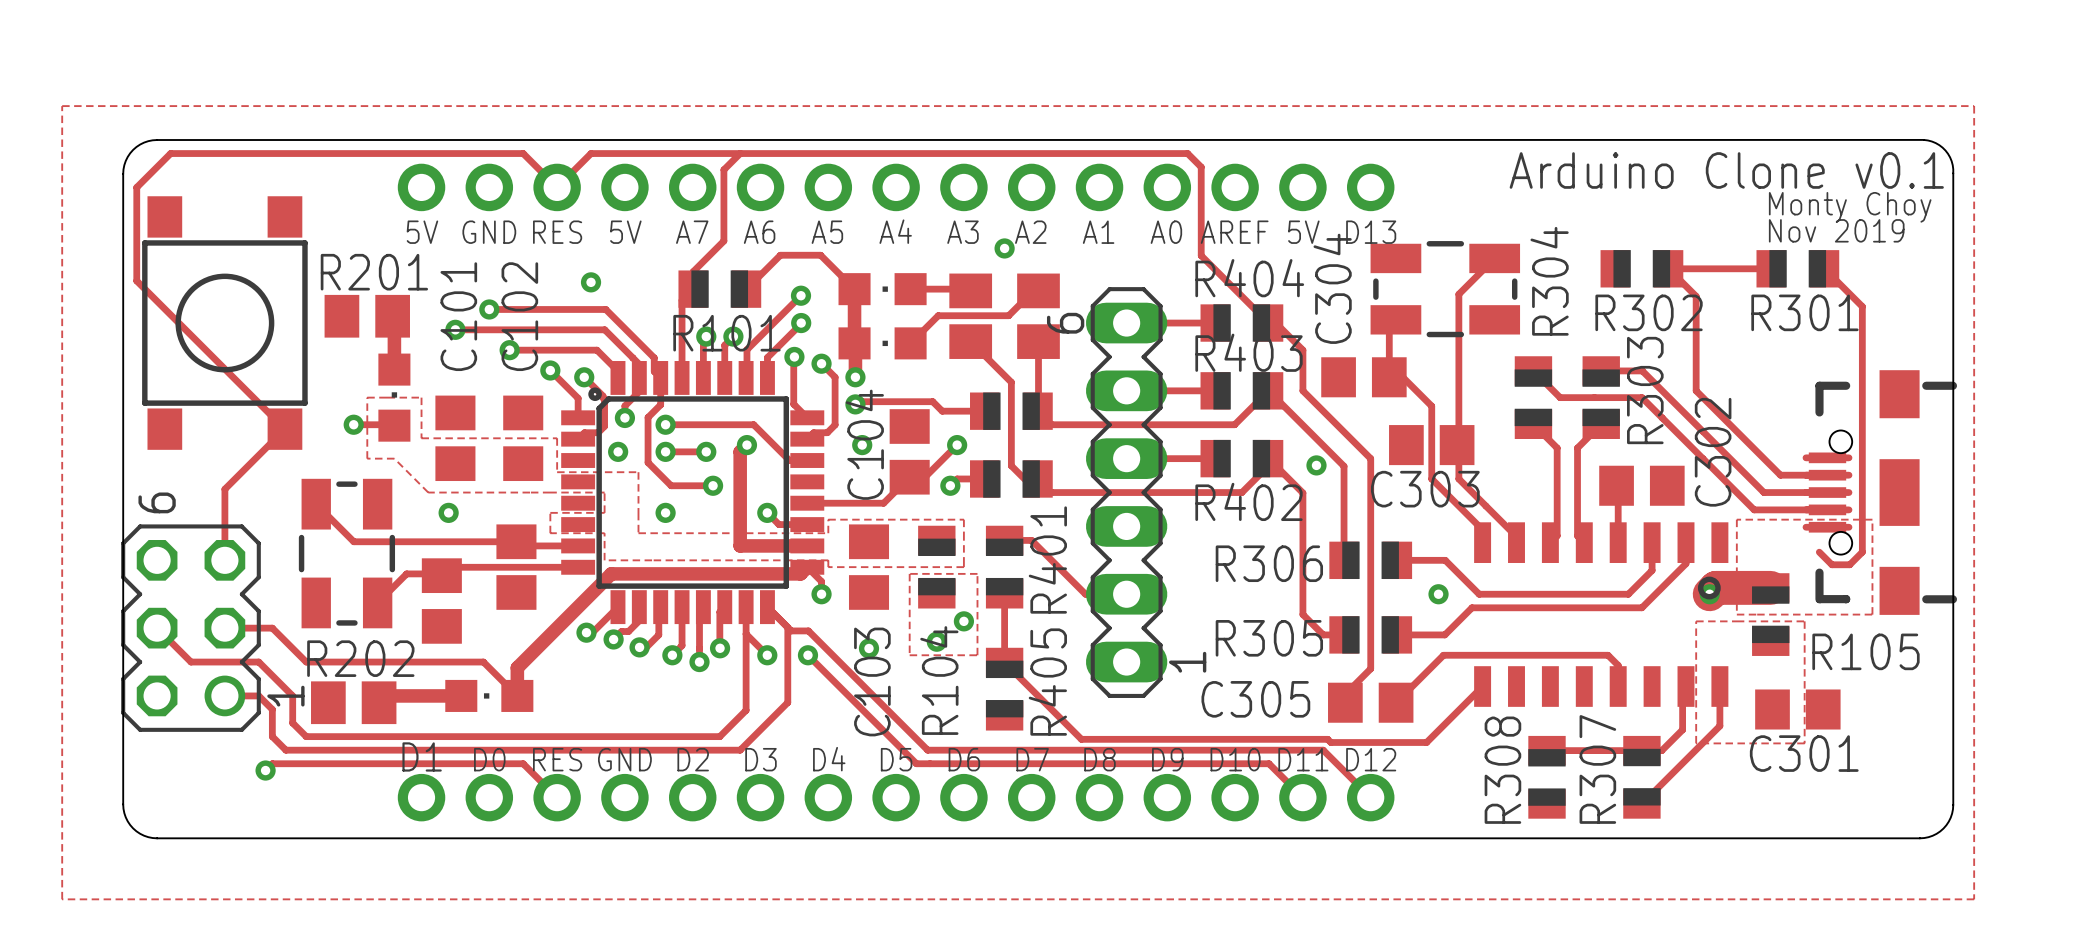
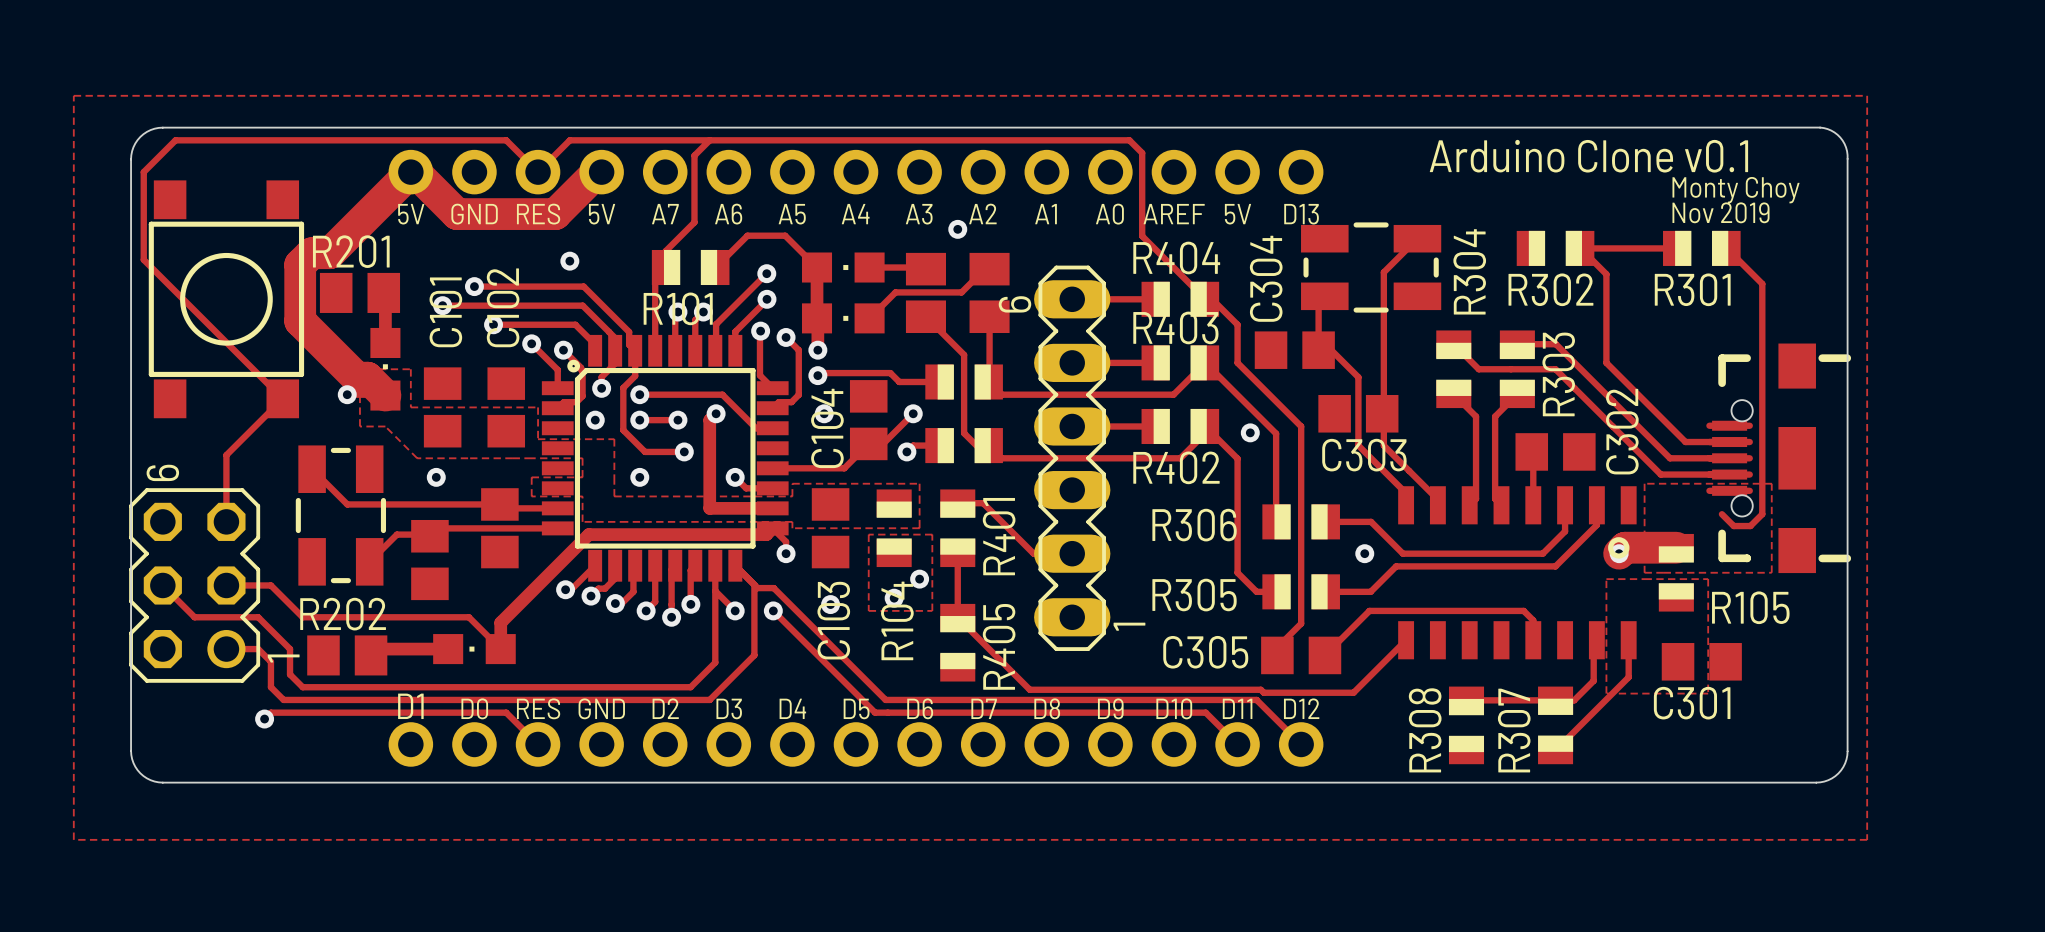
track: none -> (601, 172) (597, 172) (555, 214) (457, 214) (415, 172) (410, 172) (329, 253) (311, 253) (300, 264) (300, 321) (356, 377) (367, 377) (385, 395)

